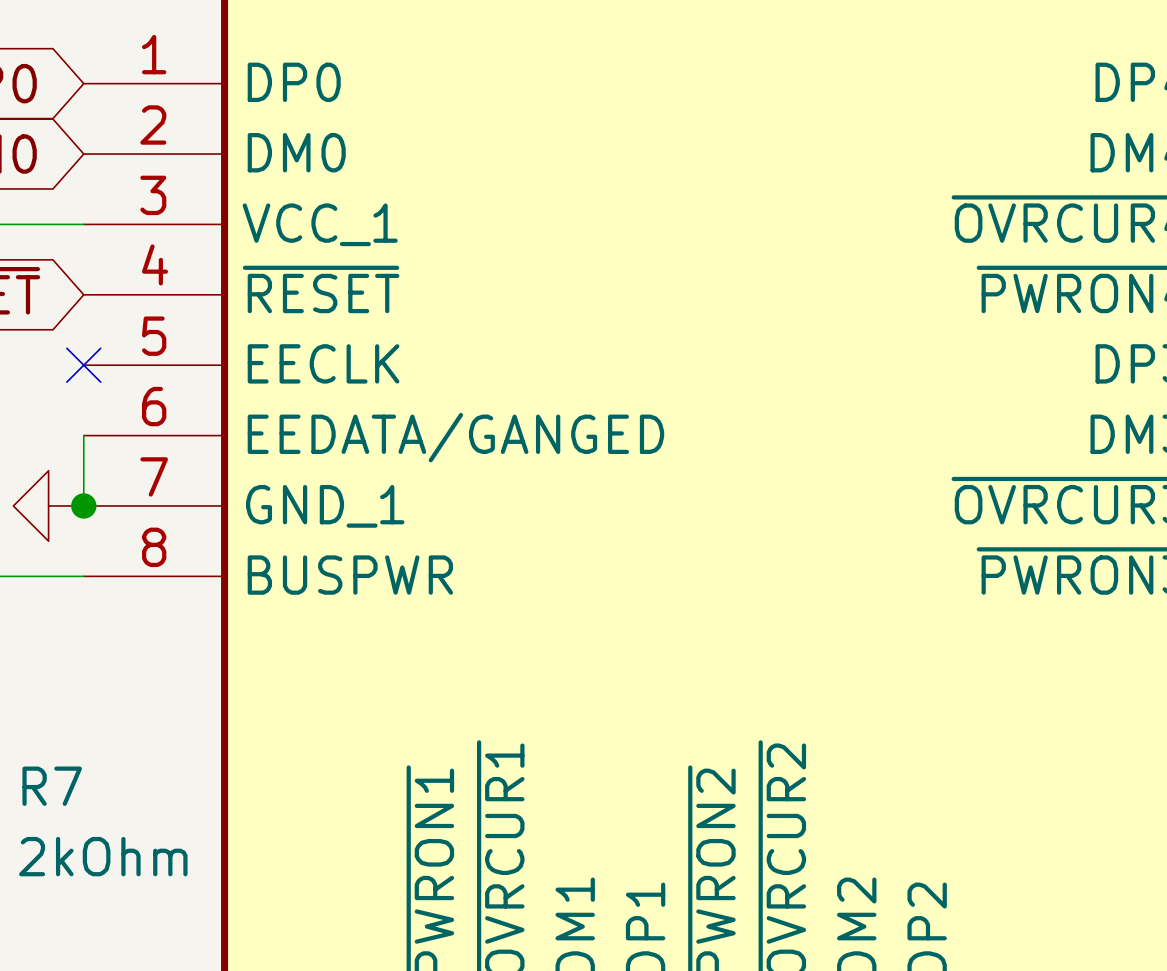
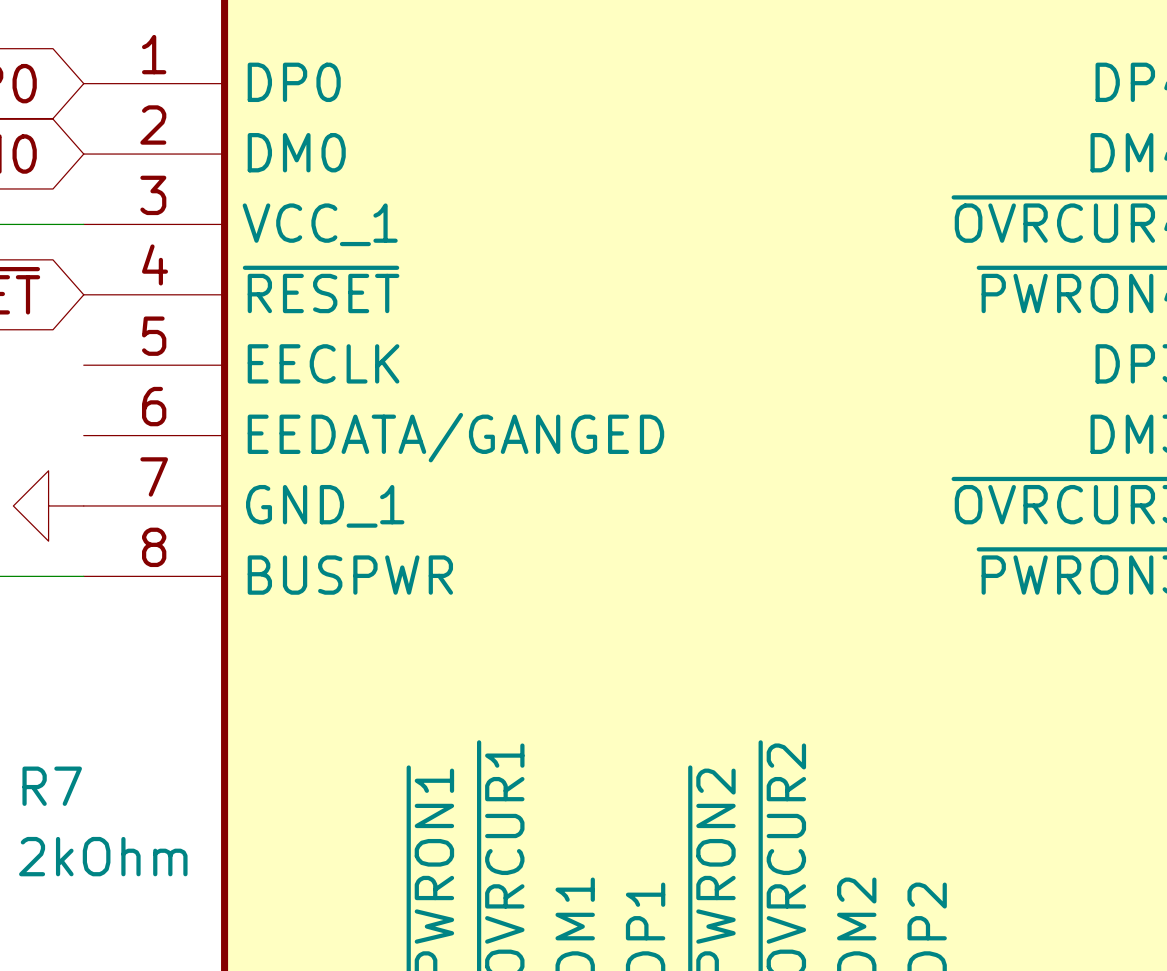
no-connect mark: (83, 365) -> none
wire: (83, 435) (83, 505) -> none
junction: (83, 505) -> none

